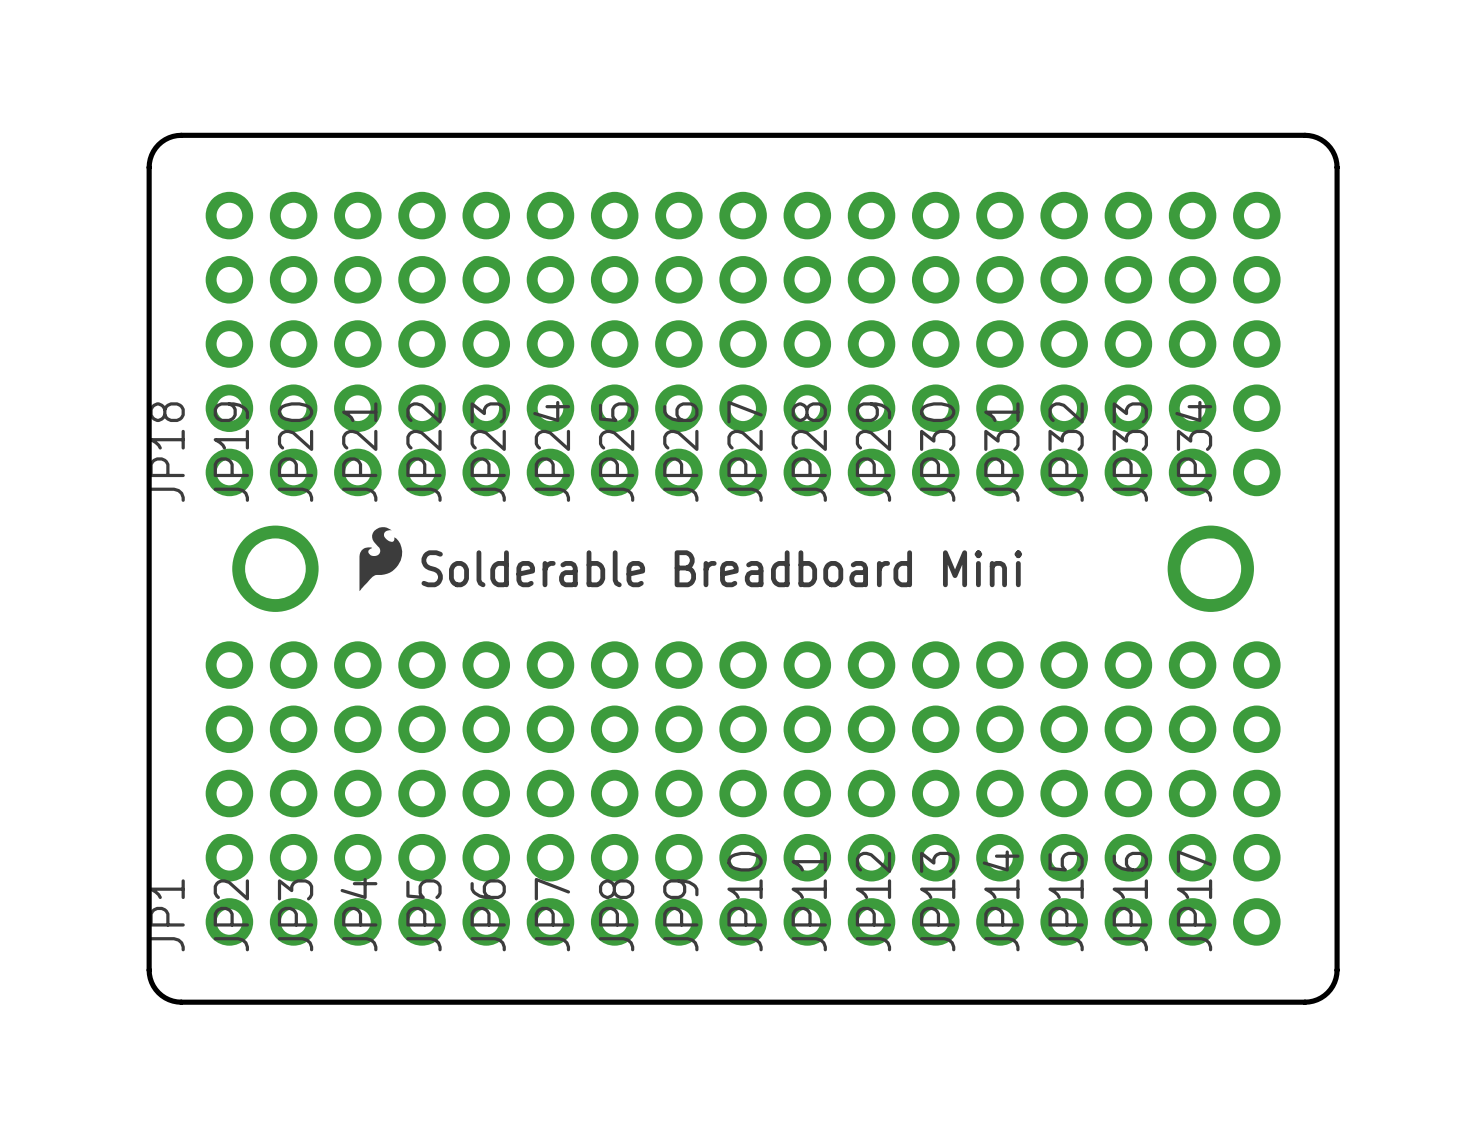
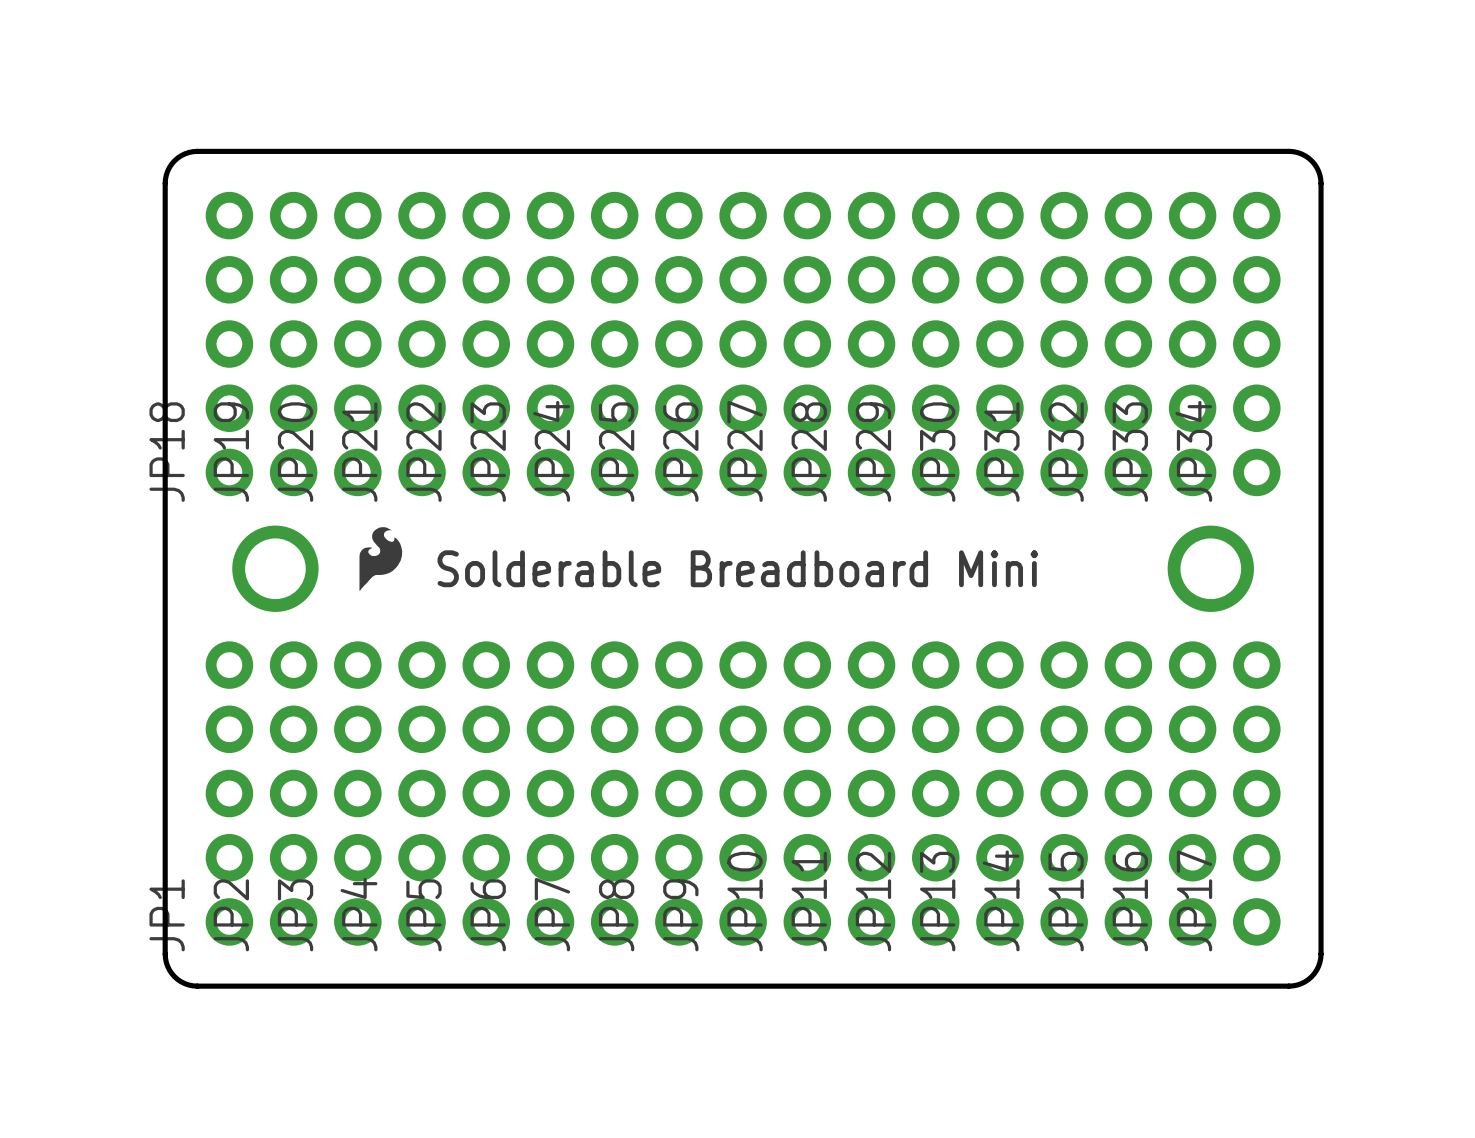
board edge: (181, 135) (1304, 135) (1313, 136) (1324, 141) (1332, 151) (1337, 167) (1337, 970) (1335, 978) (1330, 989) (1321, 997) (1304, 1002) (181, 1002) (172, 1001) (161, 995) (153, 986) (149, 970) (149, 167) (151, 155) (158, 144) (168, 137) (181, 135) -> (197, 151) (185, 153) (174, 160) (167, 171) (165, 183) (165, 954) (169, 970) (177, 979) (188, 985) (197, 986) (1288, 986) (1304, 981) (1314, 973) (1319, 962) (1321, 954) (1321, 183) (1316, 167) (1308, 158) (1297, 152) (1288, 151) (197, 151)
text position: Solderable Breadboard Mini (721, 568) -> Solderable Breadboard Mini (737, 568)

